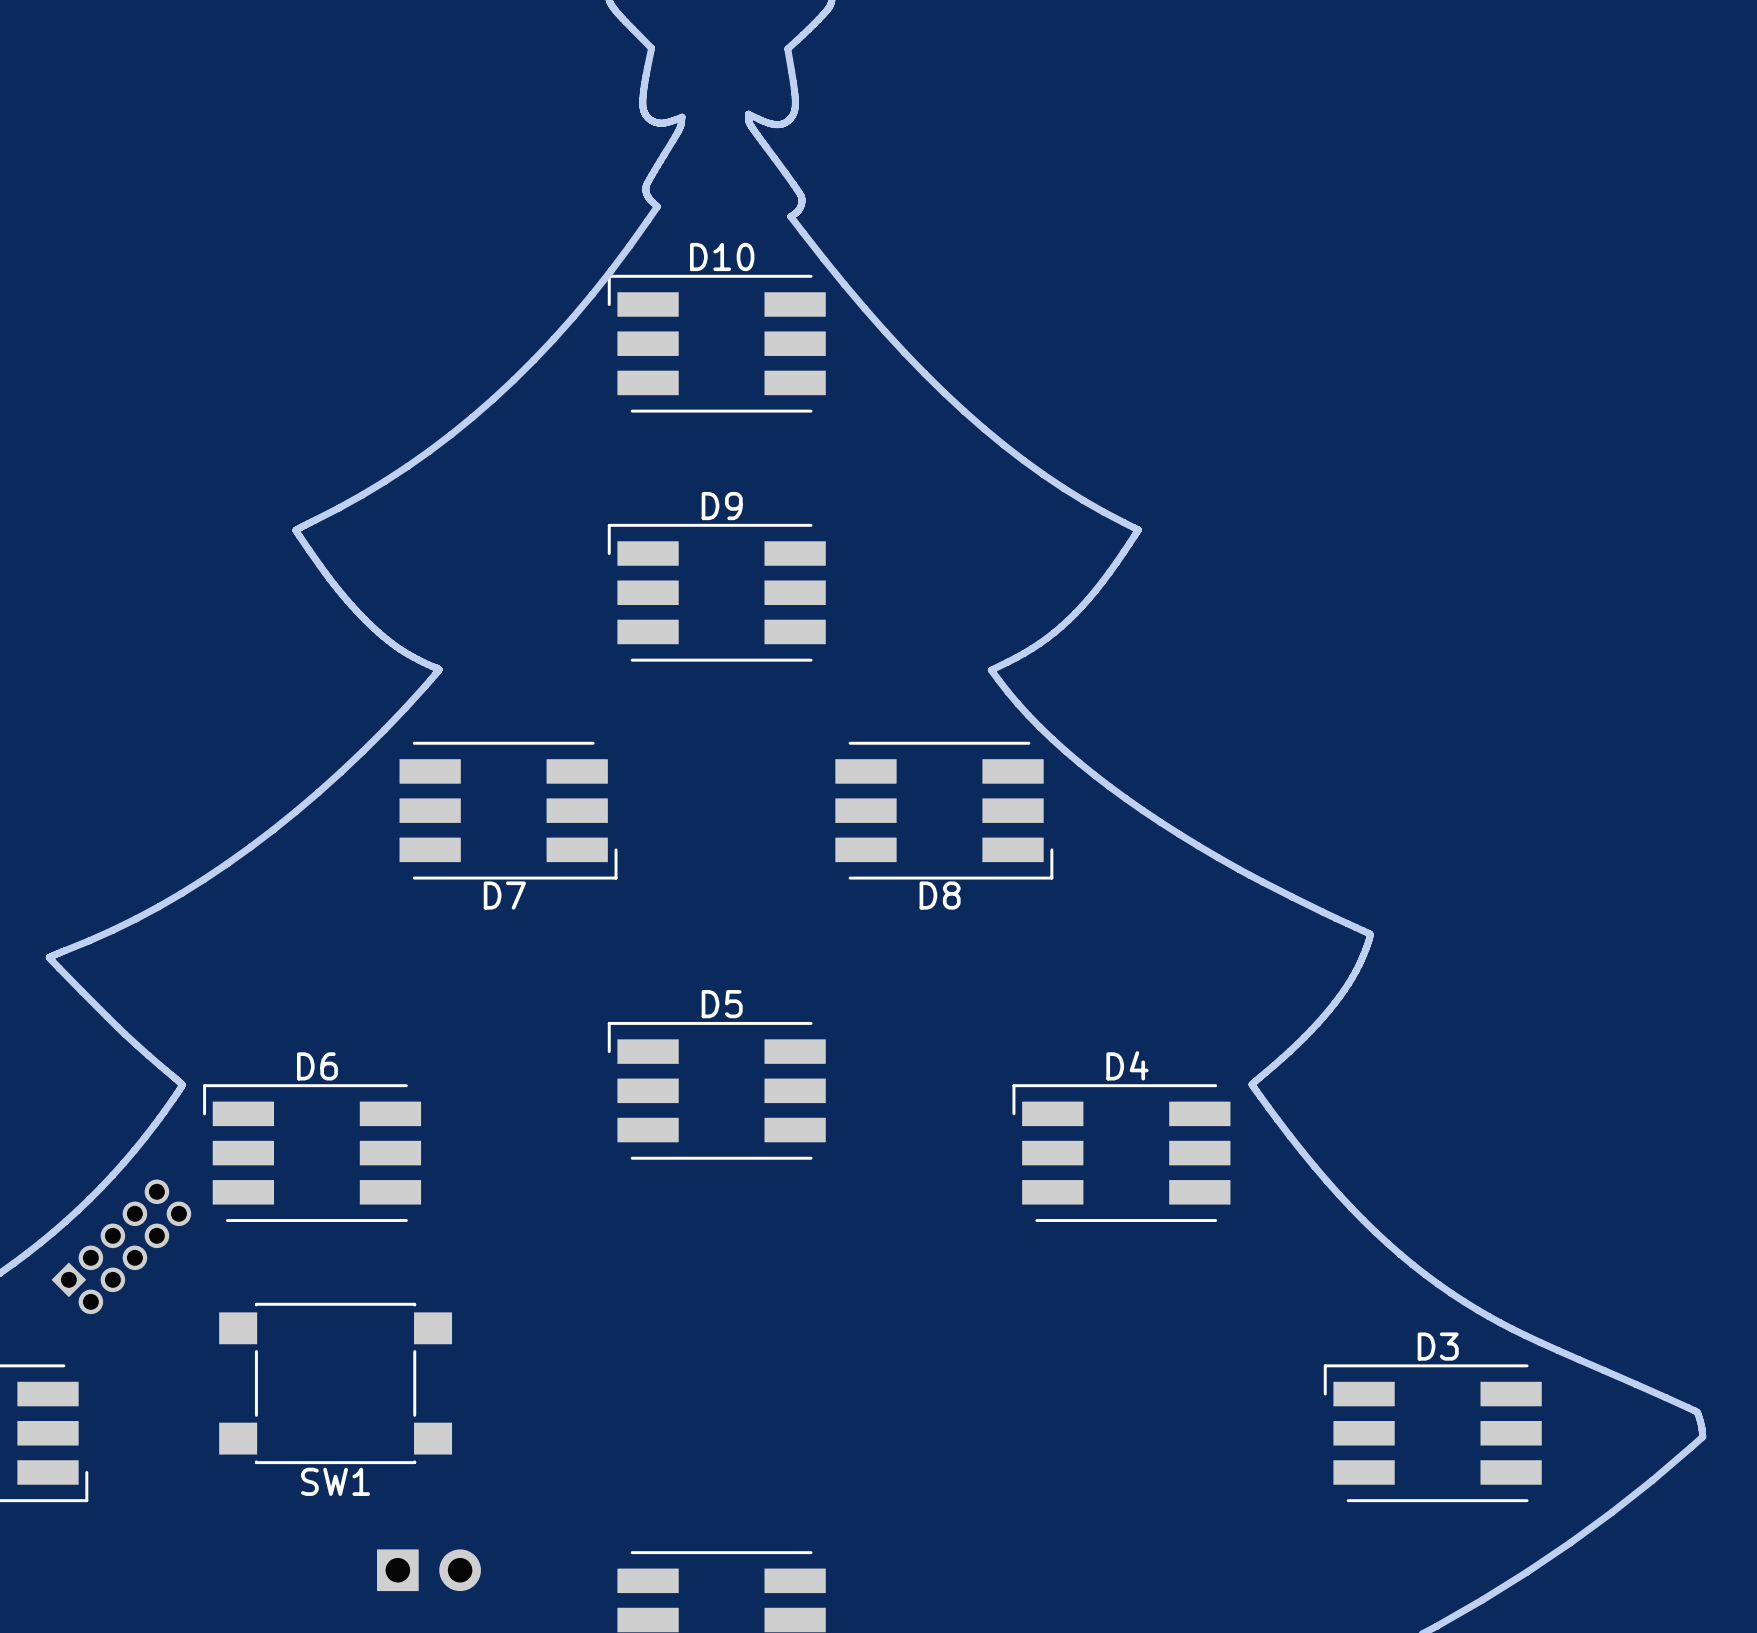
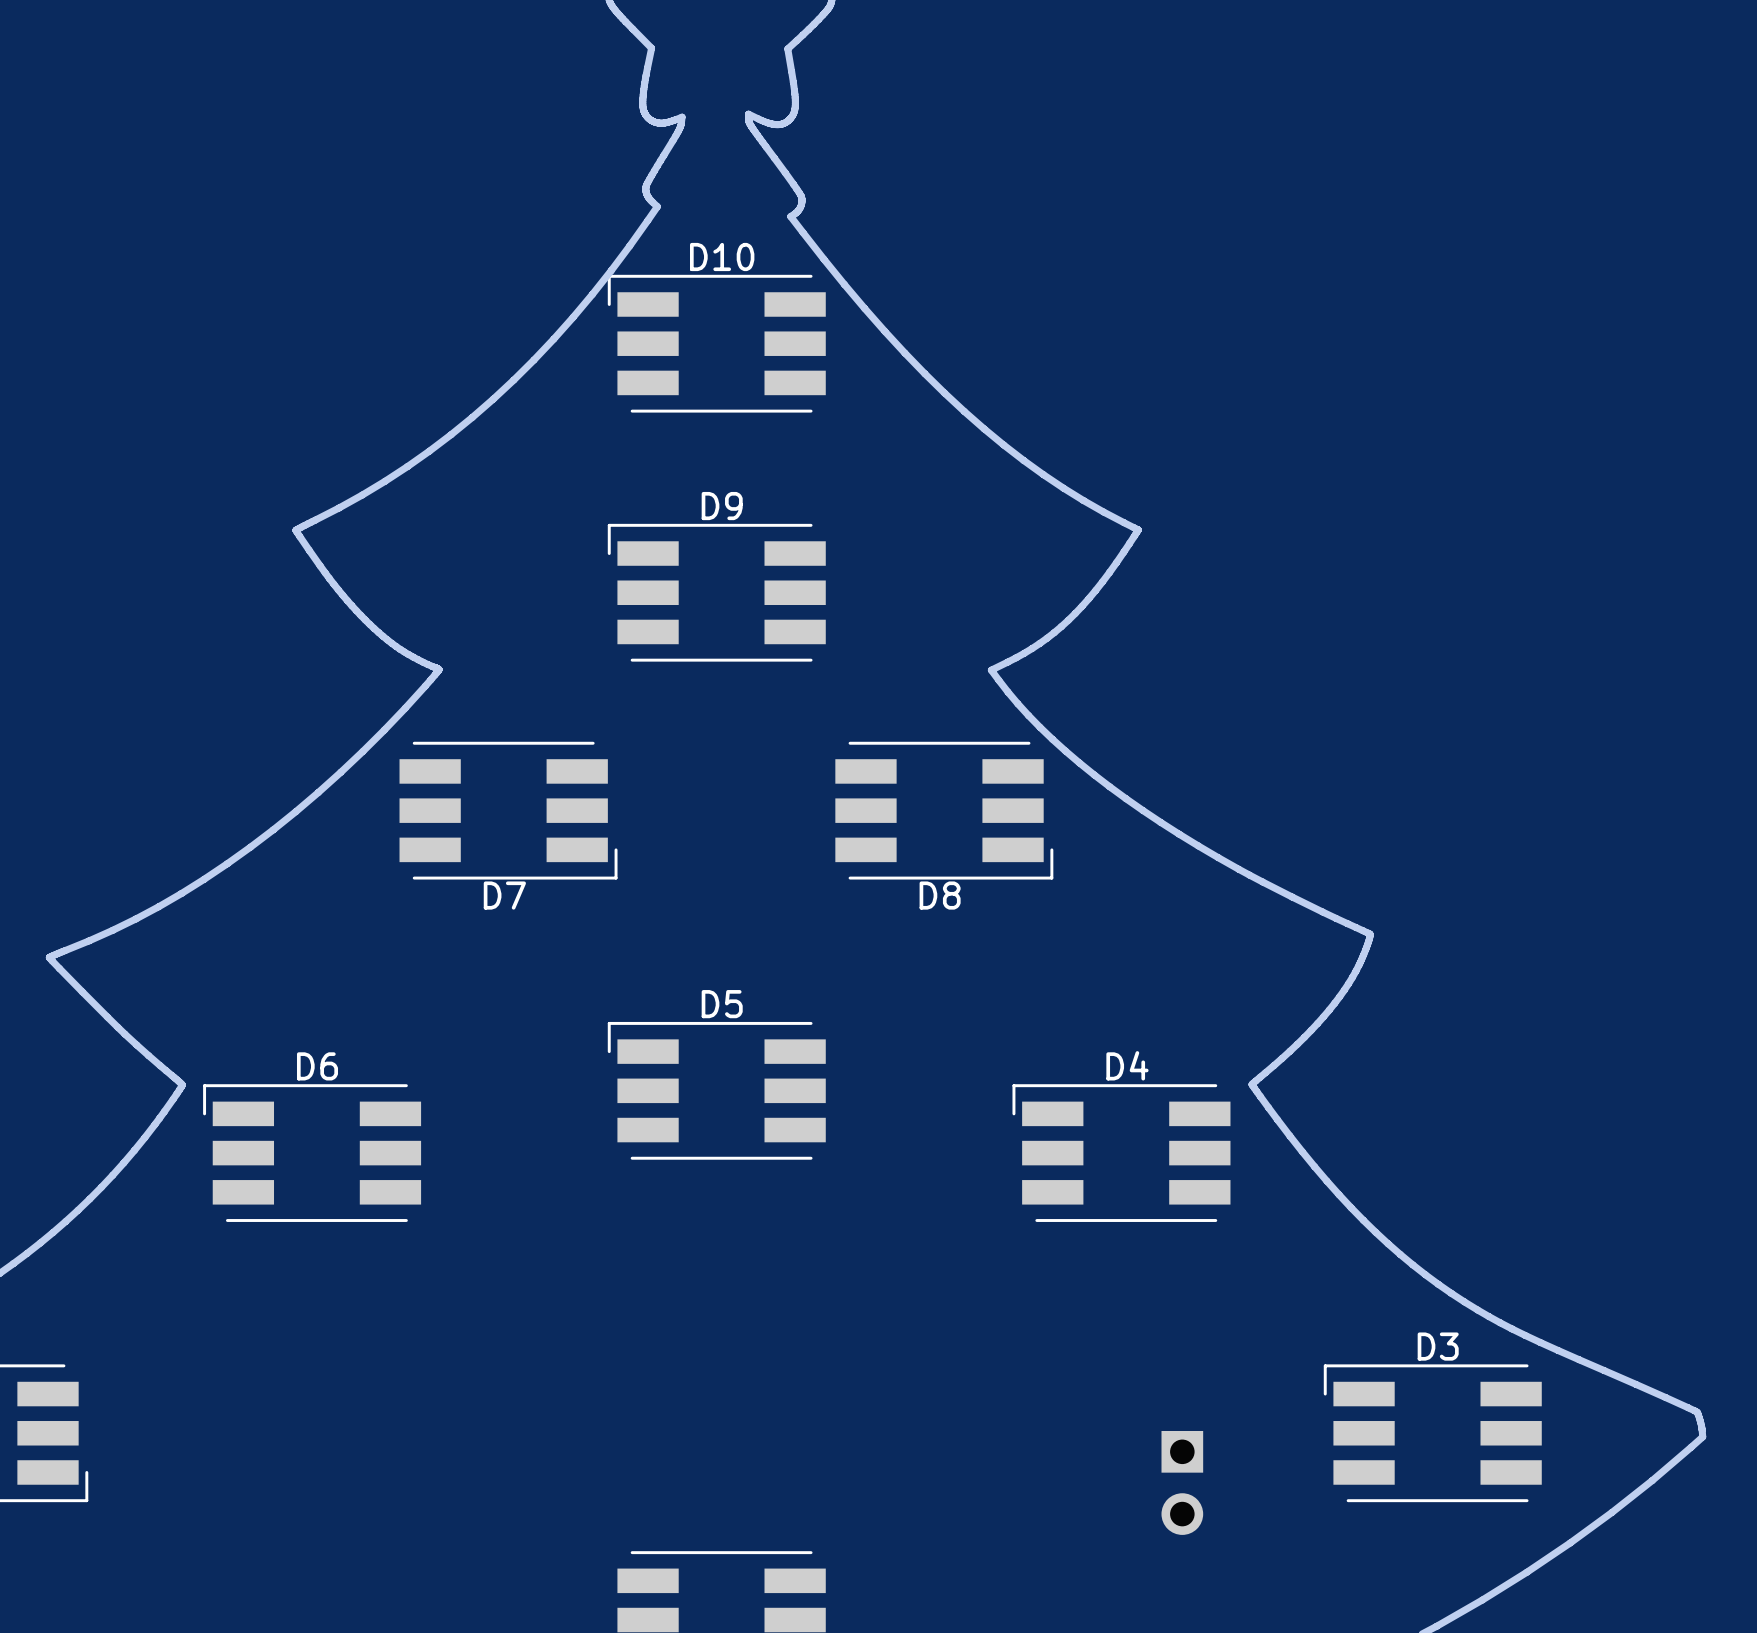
part: (121, 1246) -> none
SW1: (335, 1383) -> none
part: none -> (1182, 1482)
part: (428, 1570) -> none

